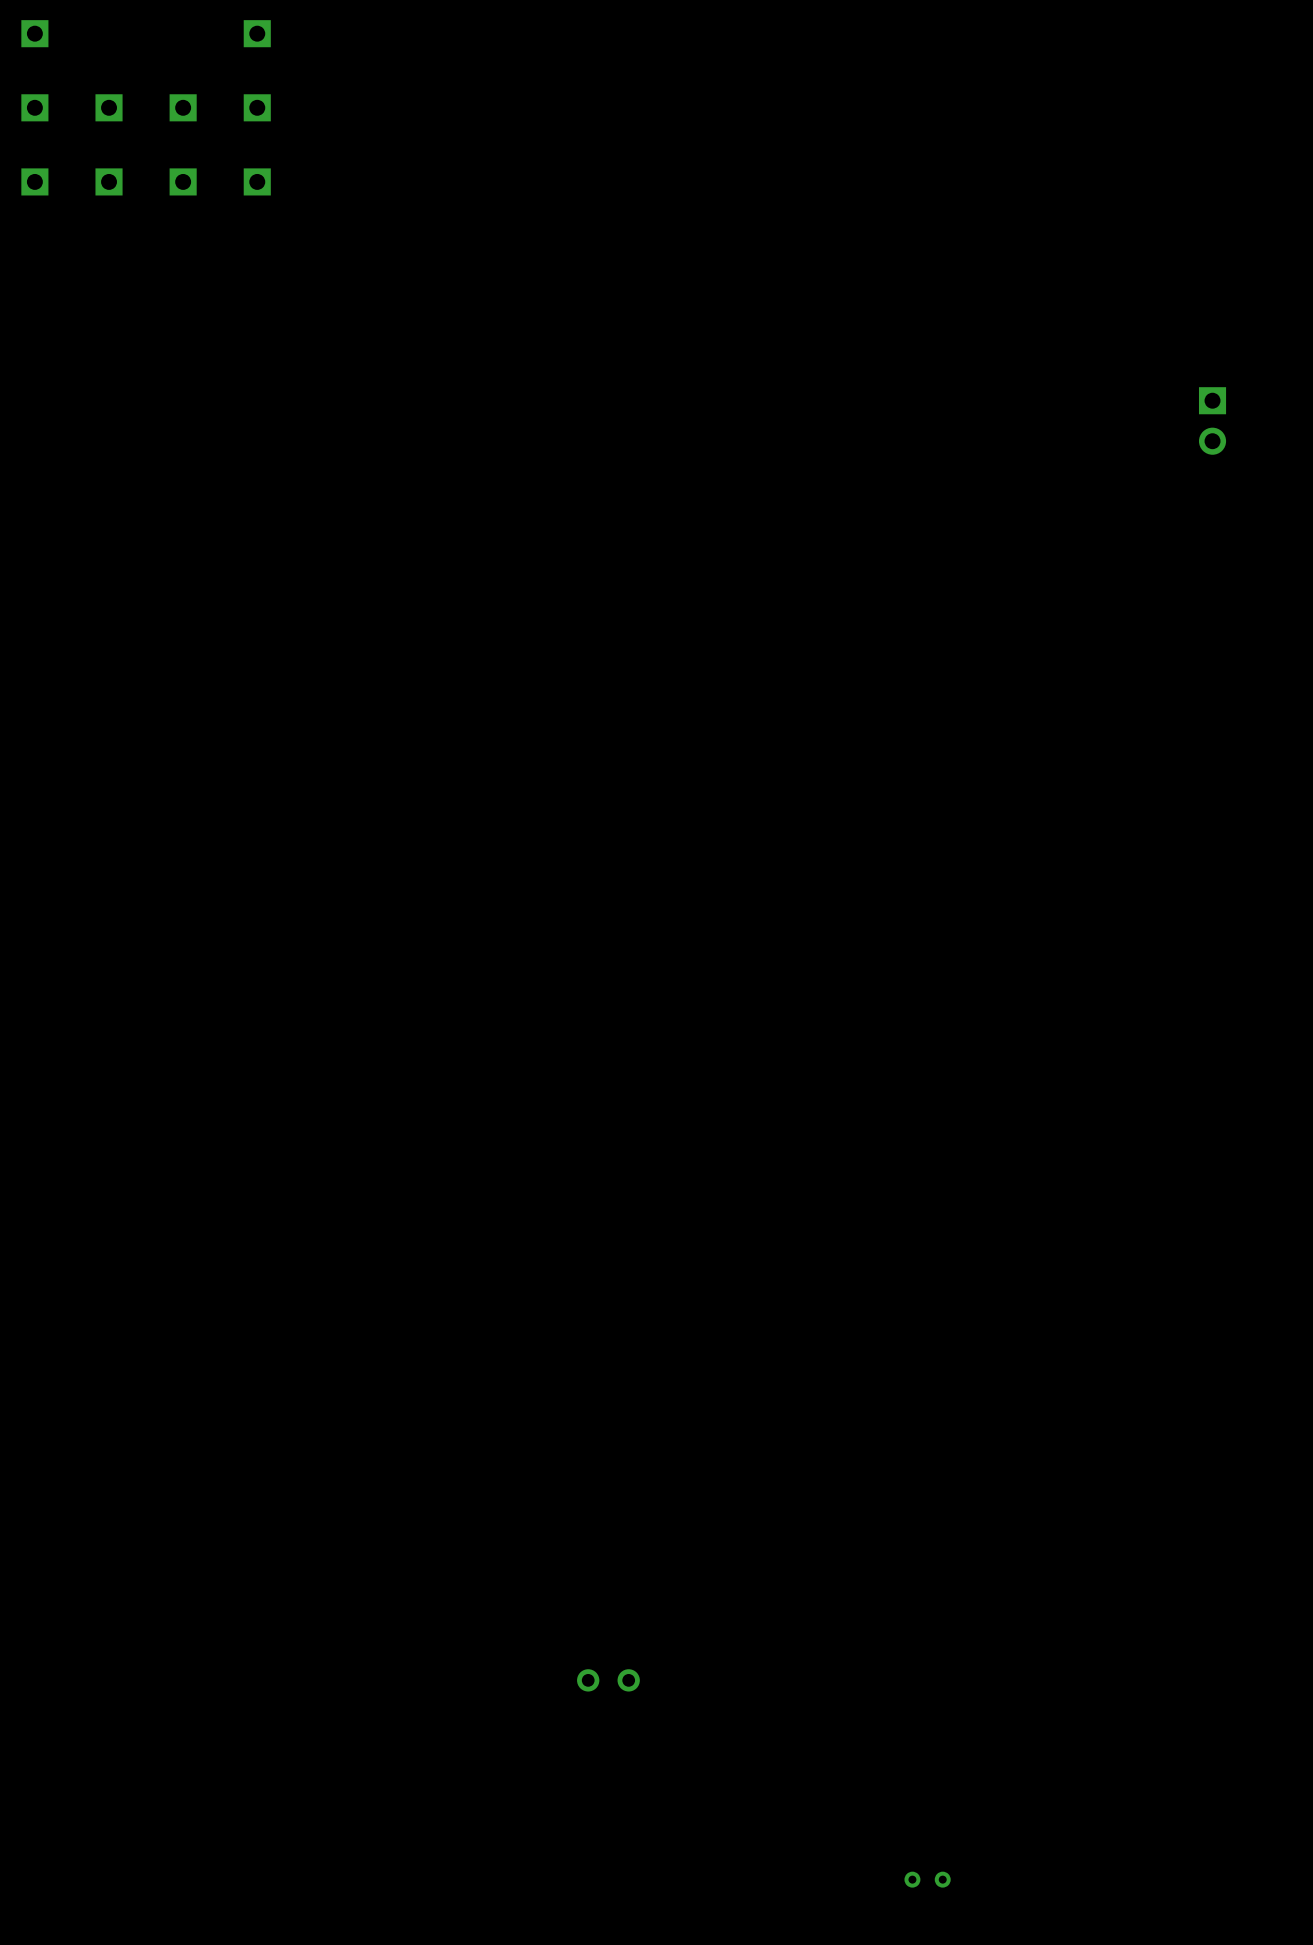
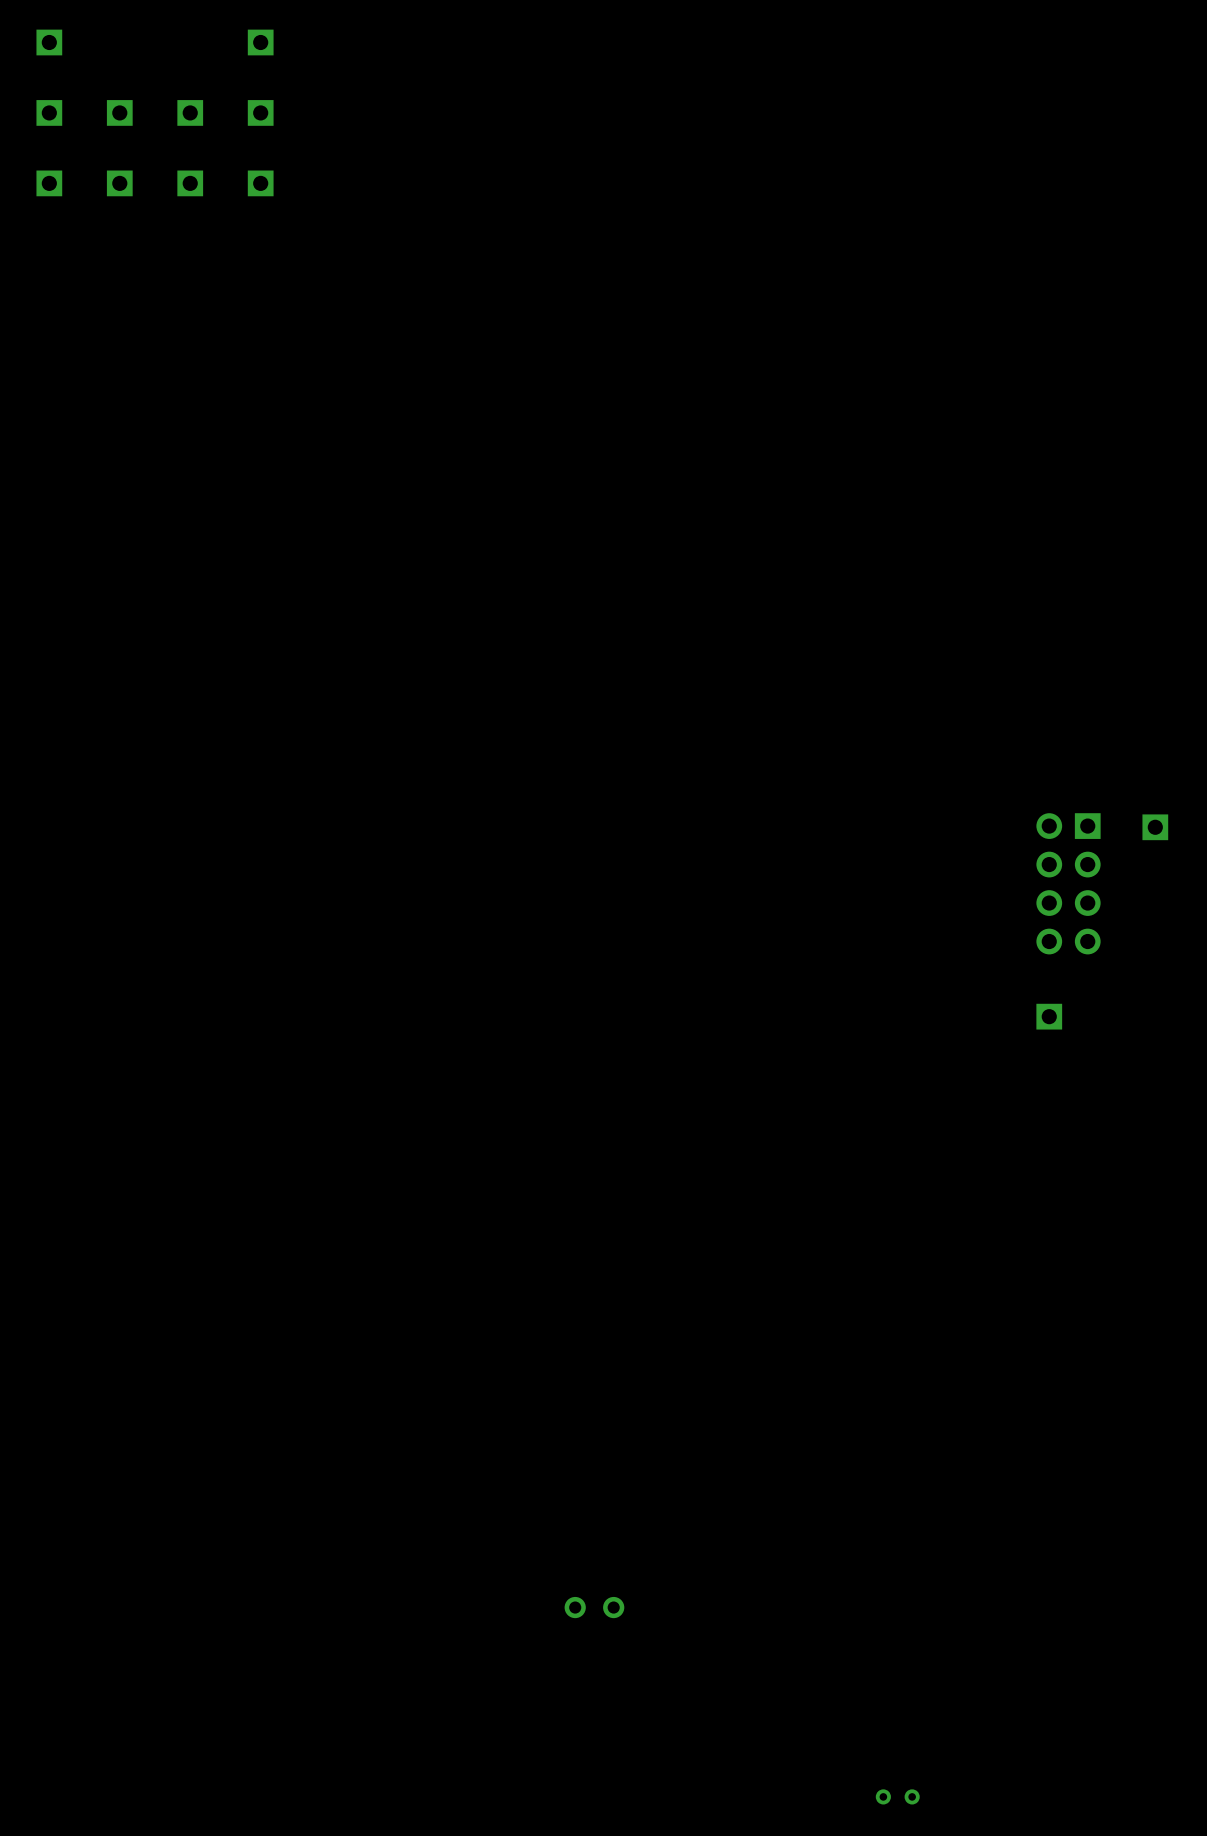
part: (1212, 420) -> none
part: none -> (1155, 827)
part: none -> (1068, 883)
part: none -> (1049, 1016)

